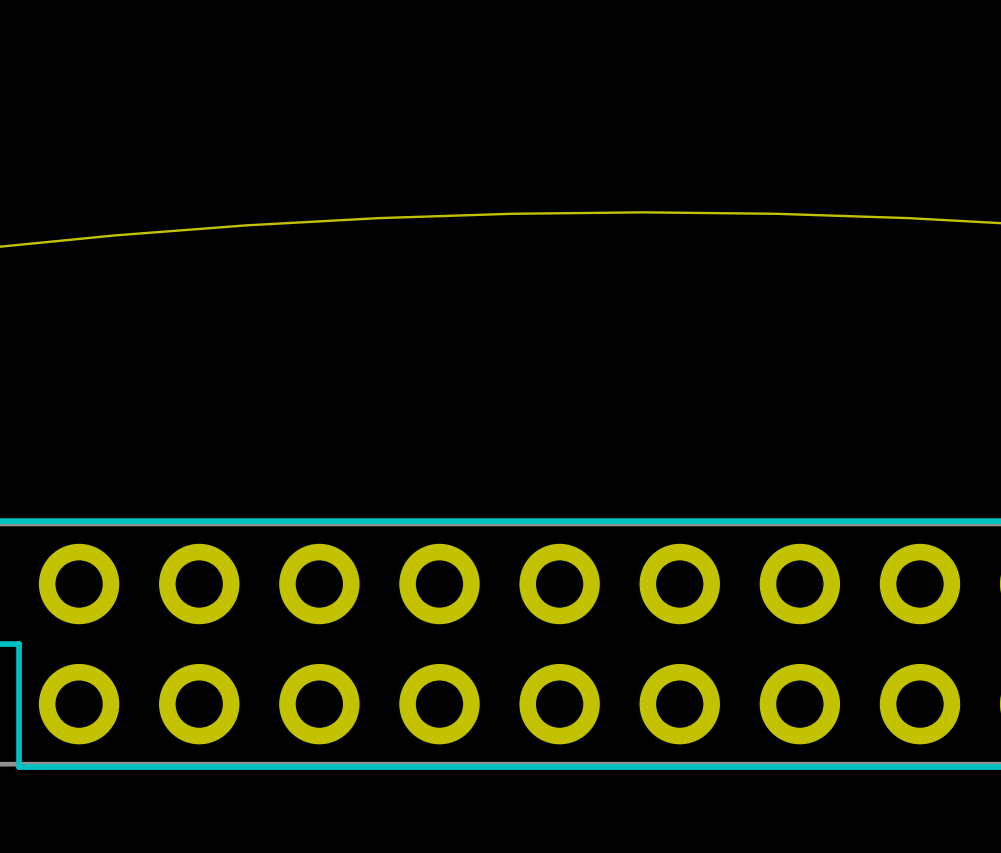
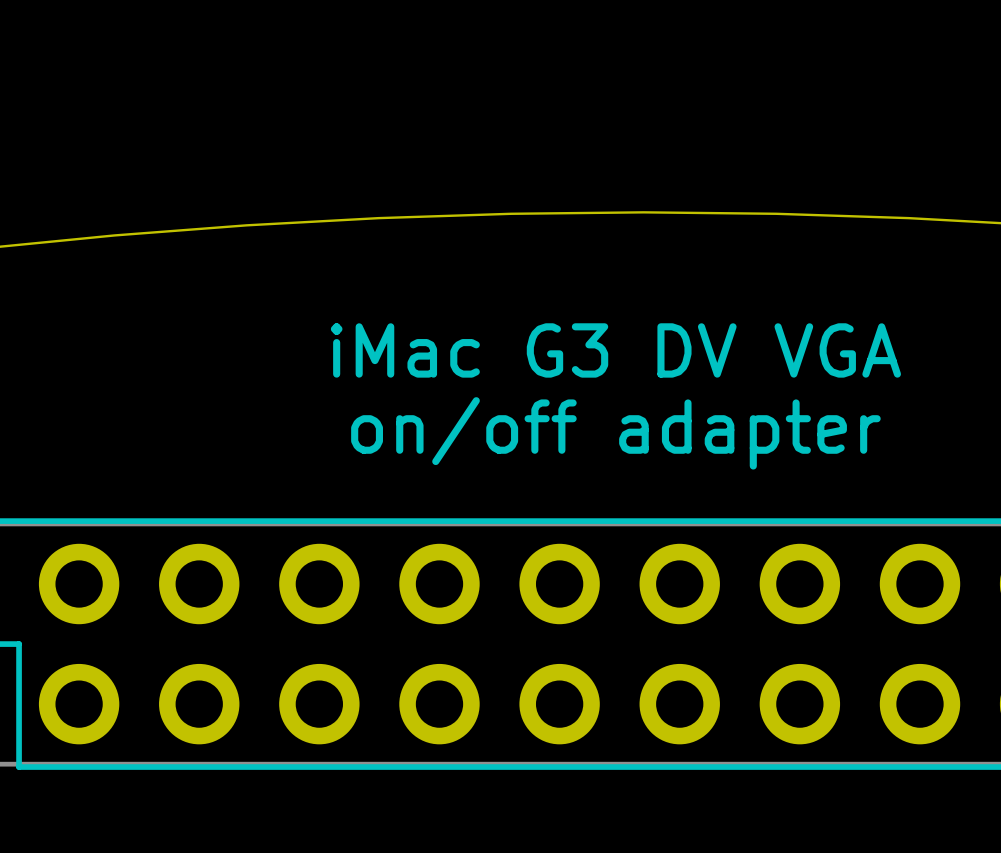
text: none -> iMac G3 DV VGA (615, 350)
text: none -> on/off adapter (615, 433)

